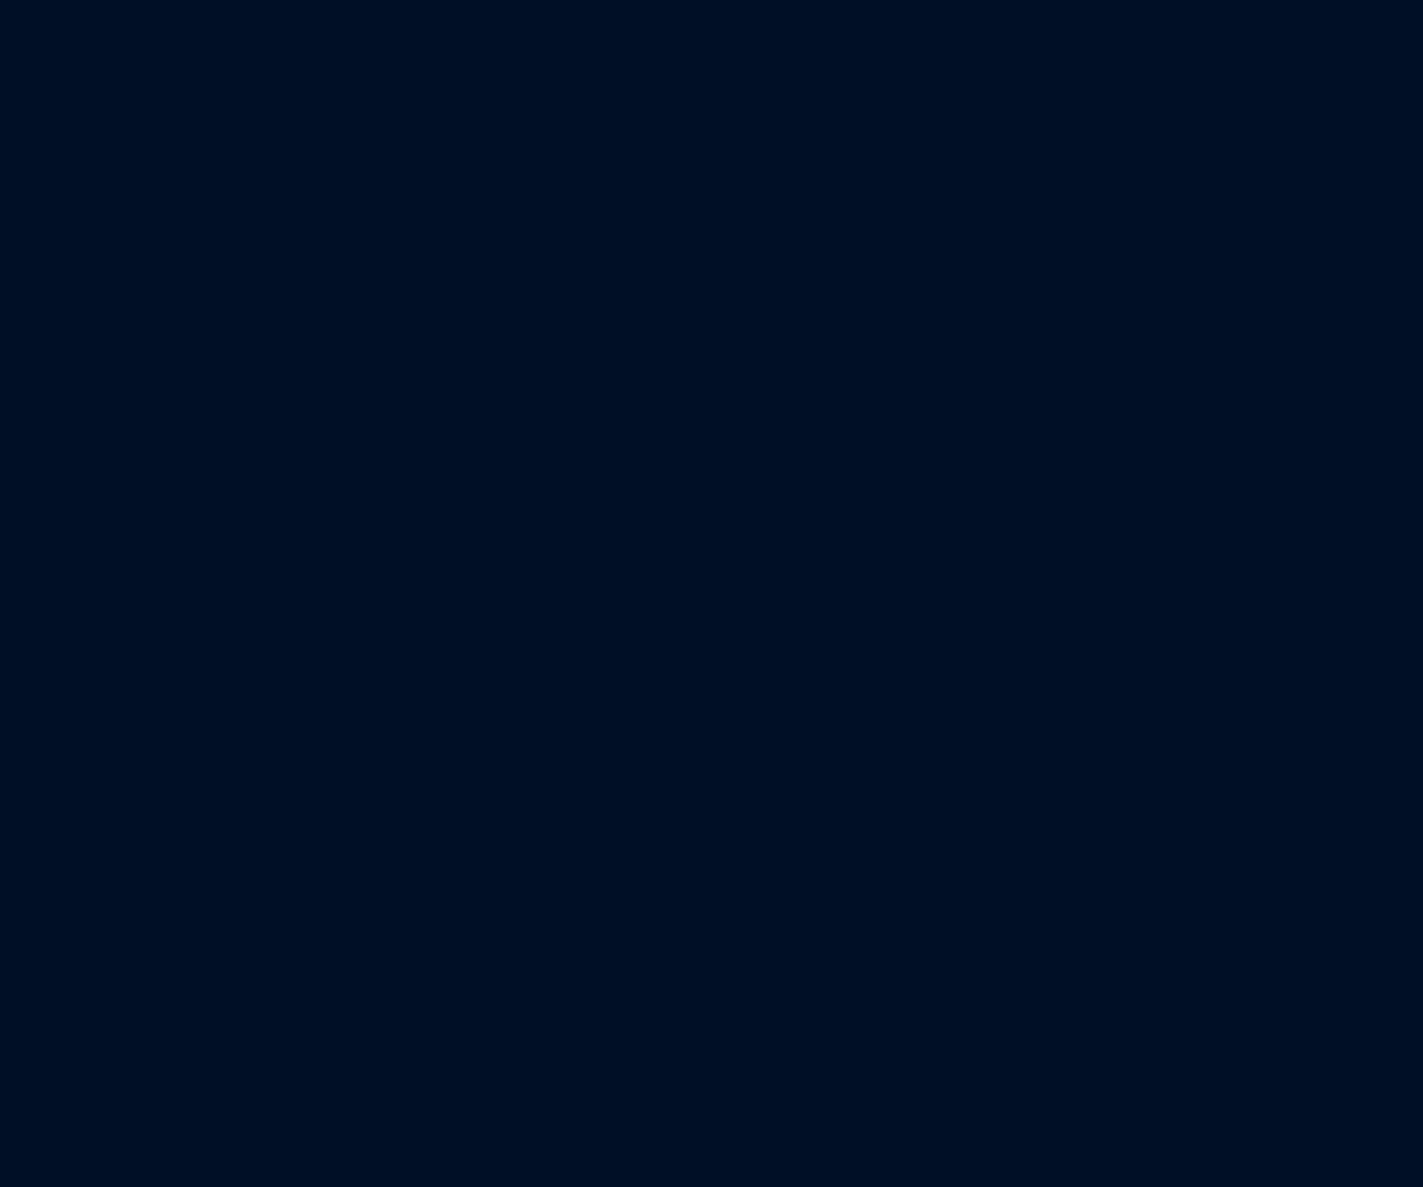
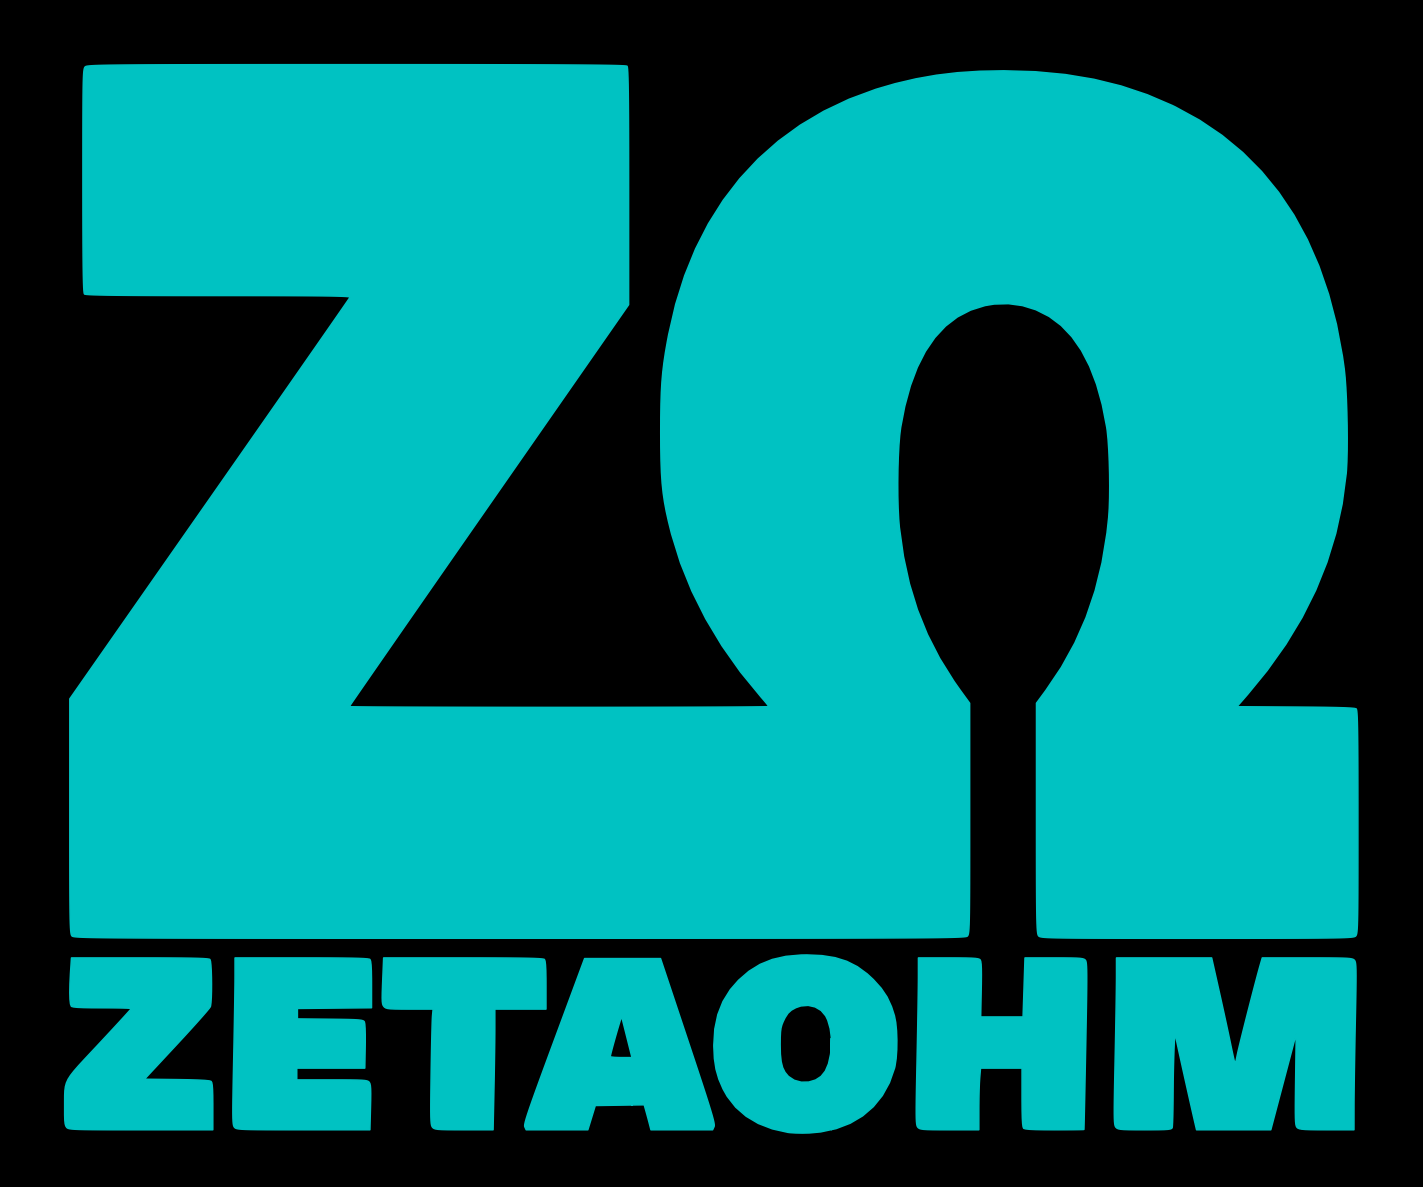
drawing: none -> [63, 63, 1359, 1134]

